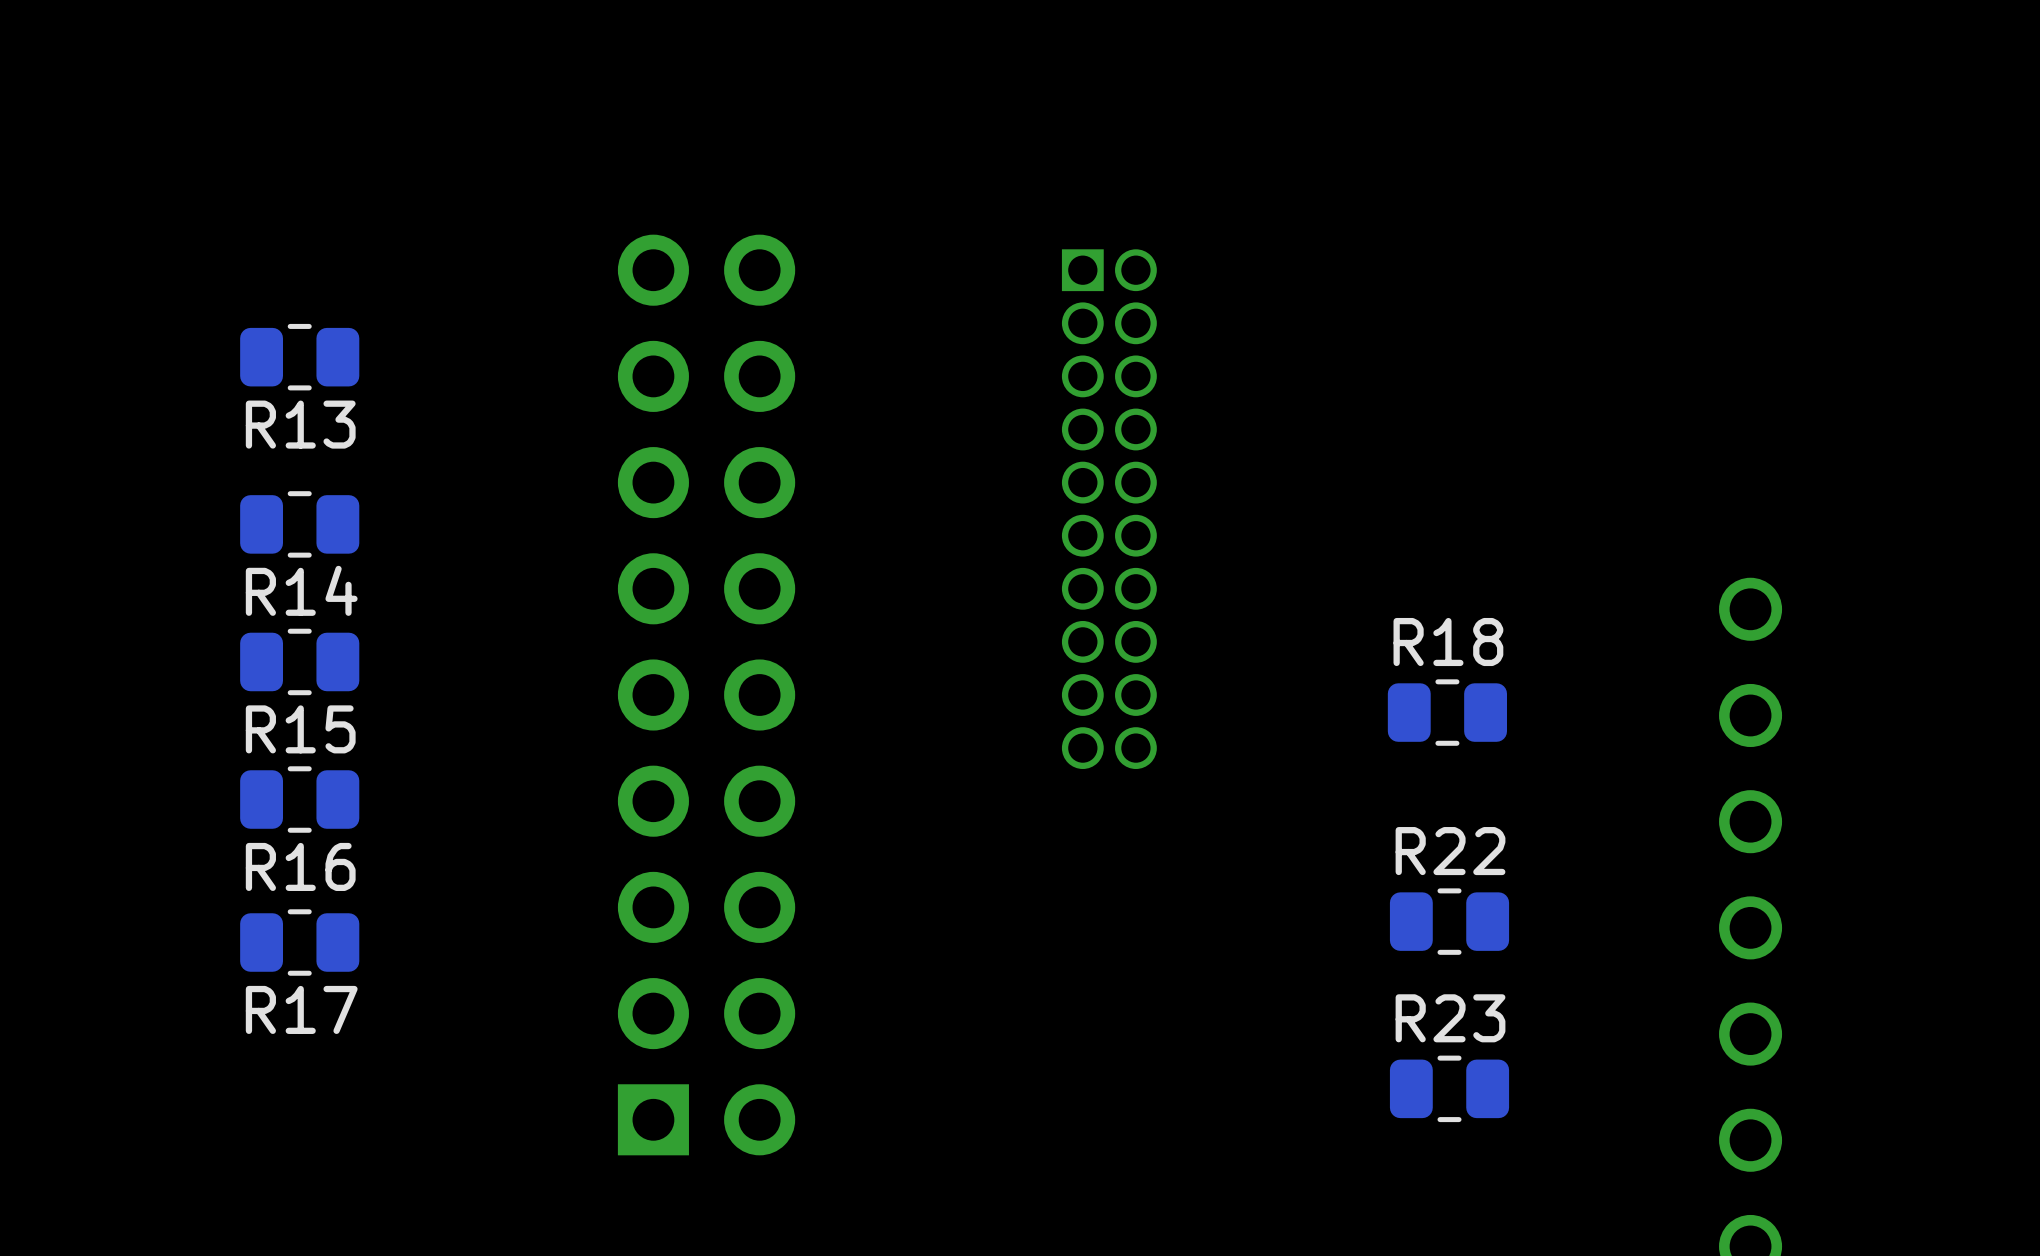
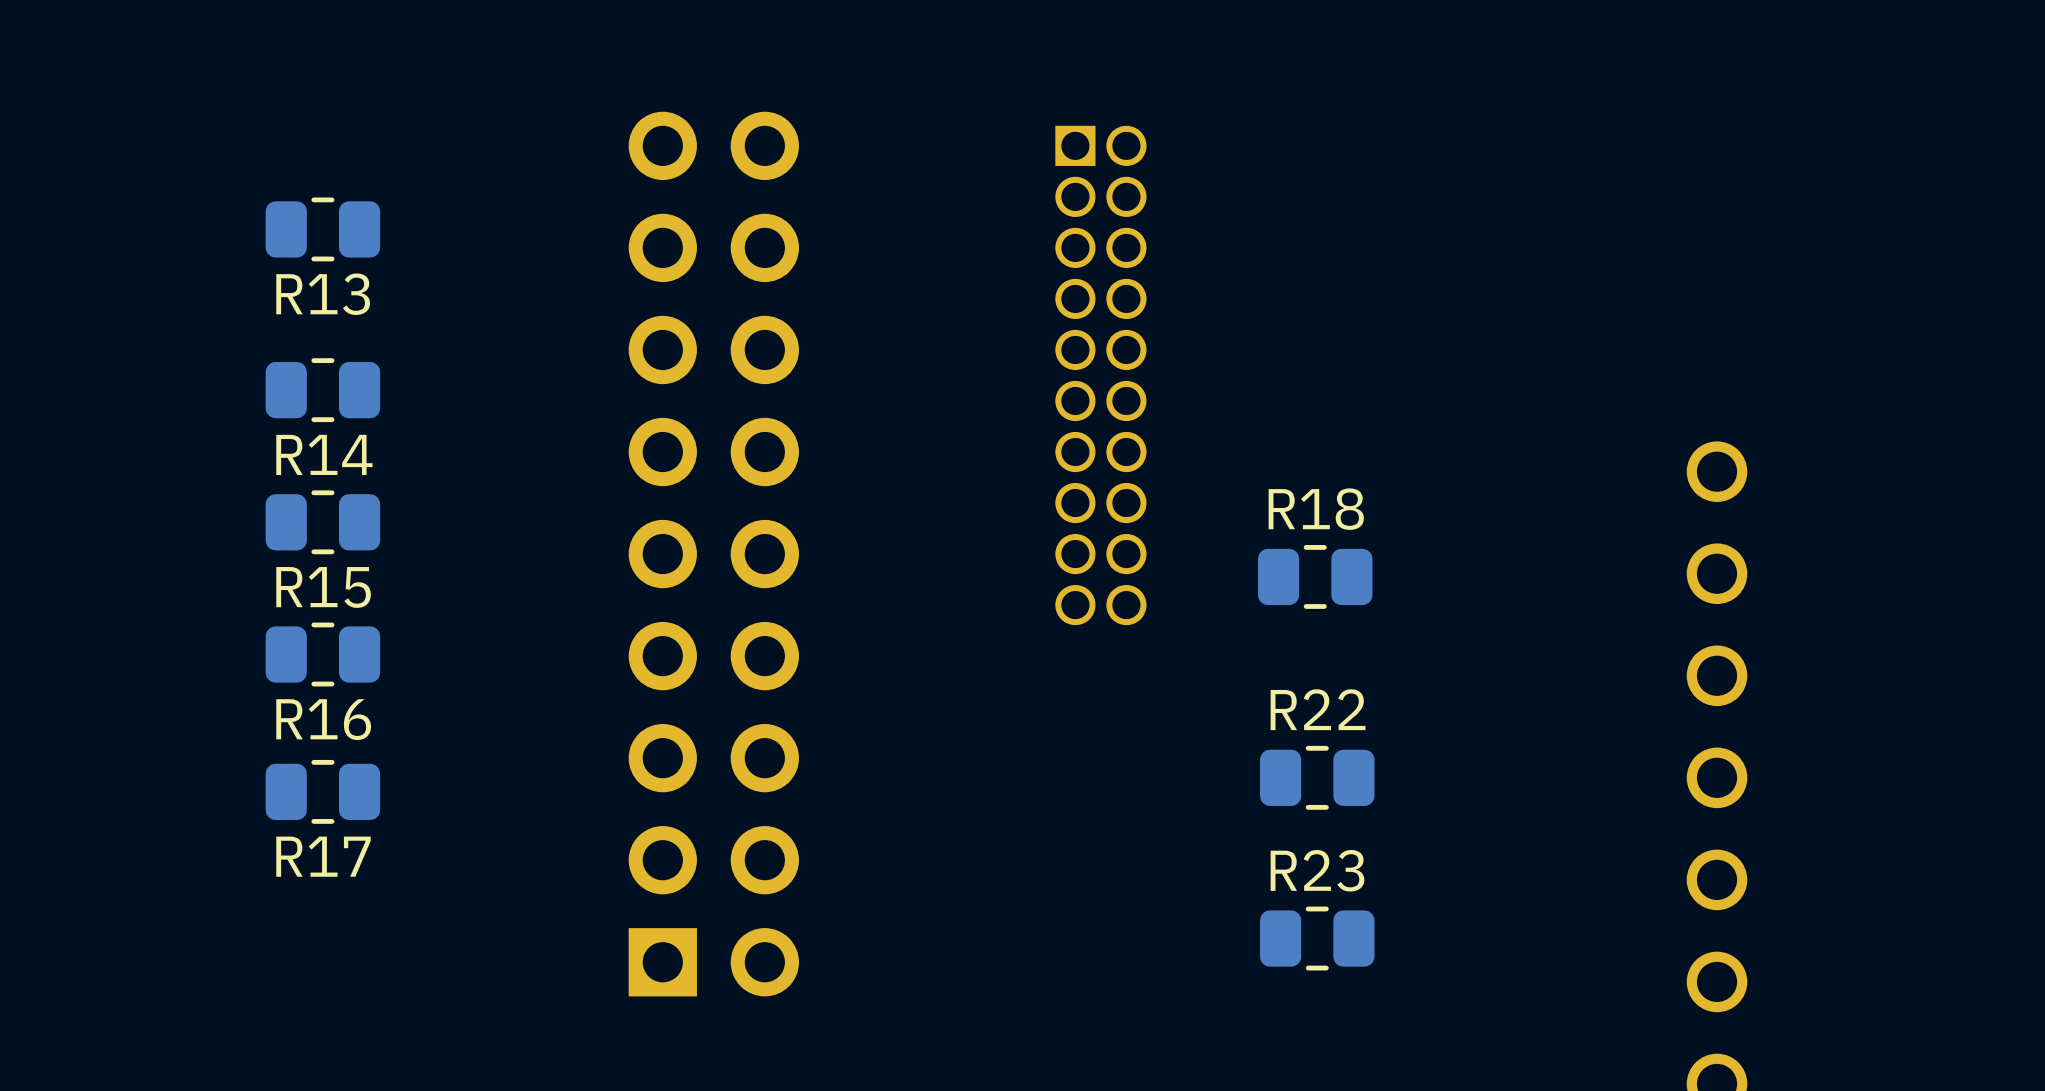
R18 position: (1447, 712) -> (1315, 576)
R22 position: (1449, 921) -> (1317, 777)
R23 position: (1449, 1088) -> (1317, 938)

